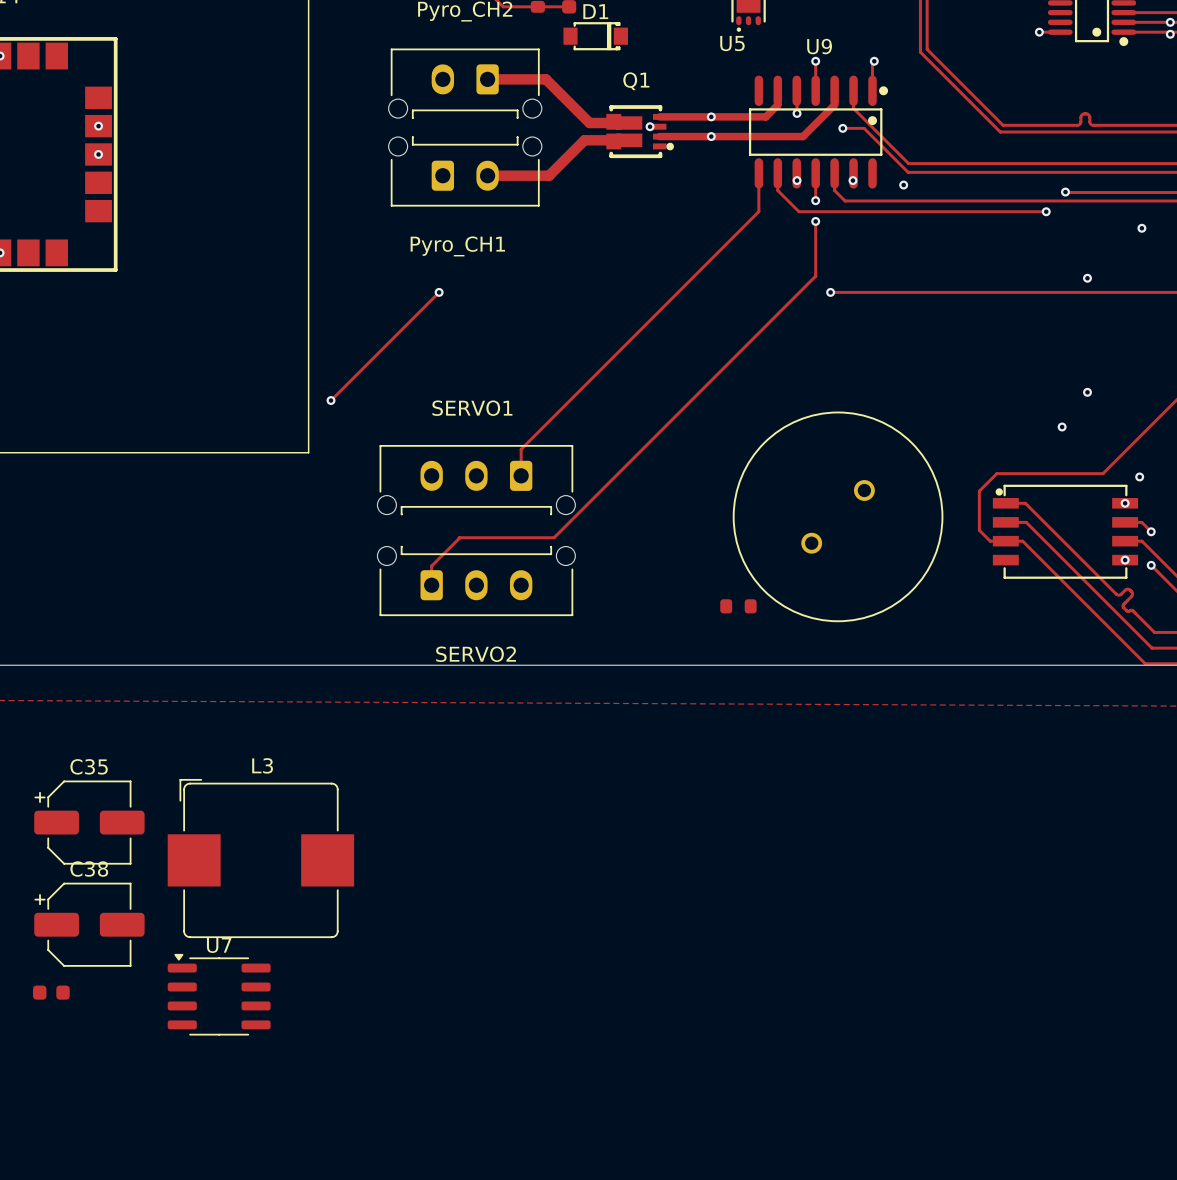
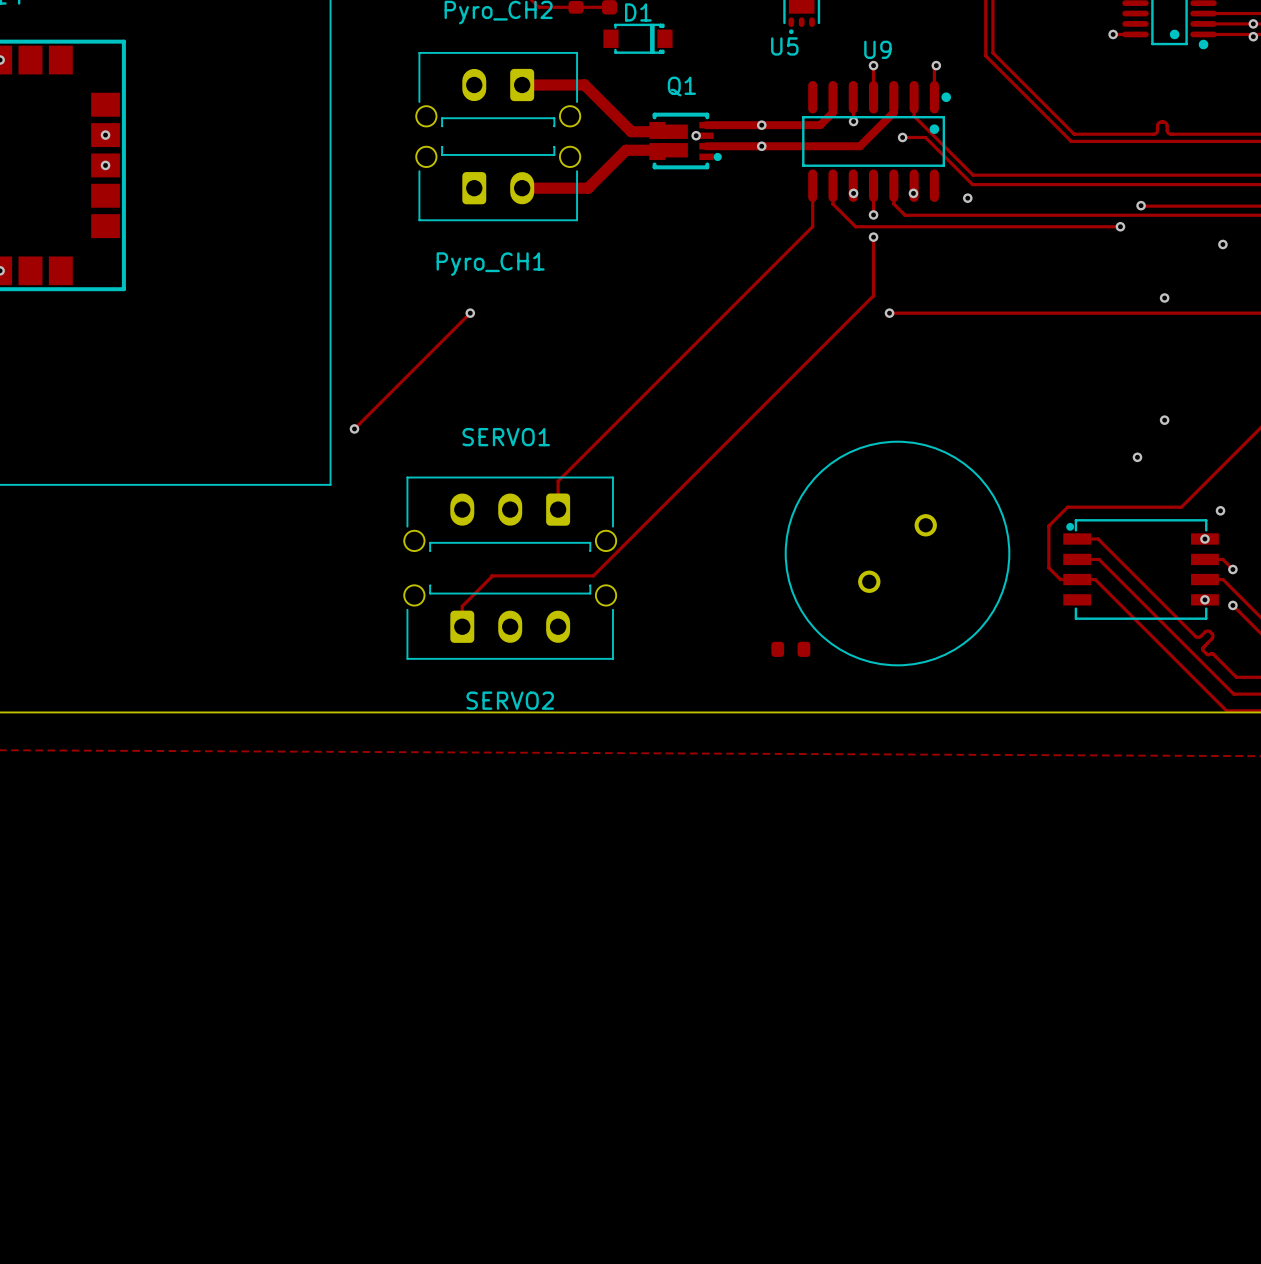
C35: (89, 822) -> none
L3: (260, 858) -> none
C38: (89, 924) -> none
part: (51, 992) -> none
U7: (219, 994) -> none

